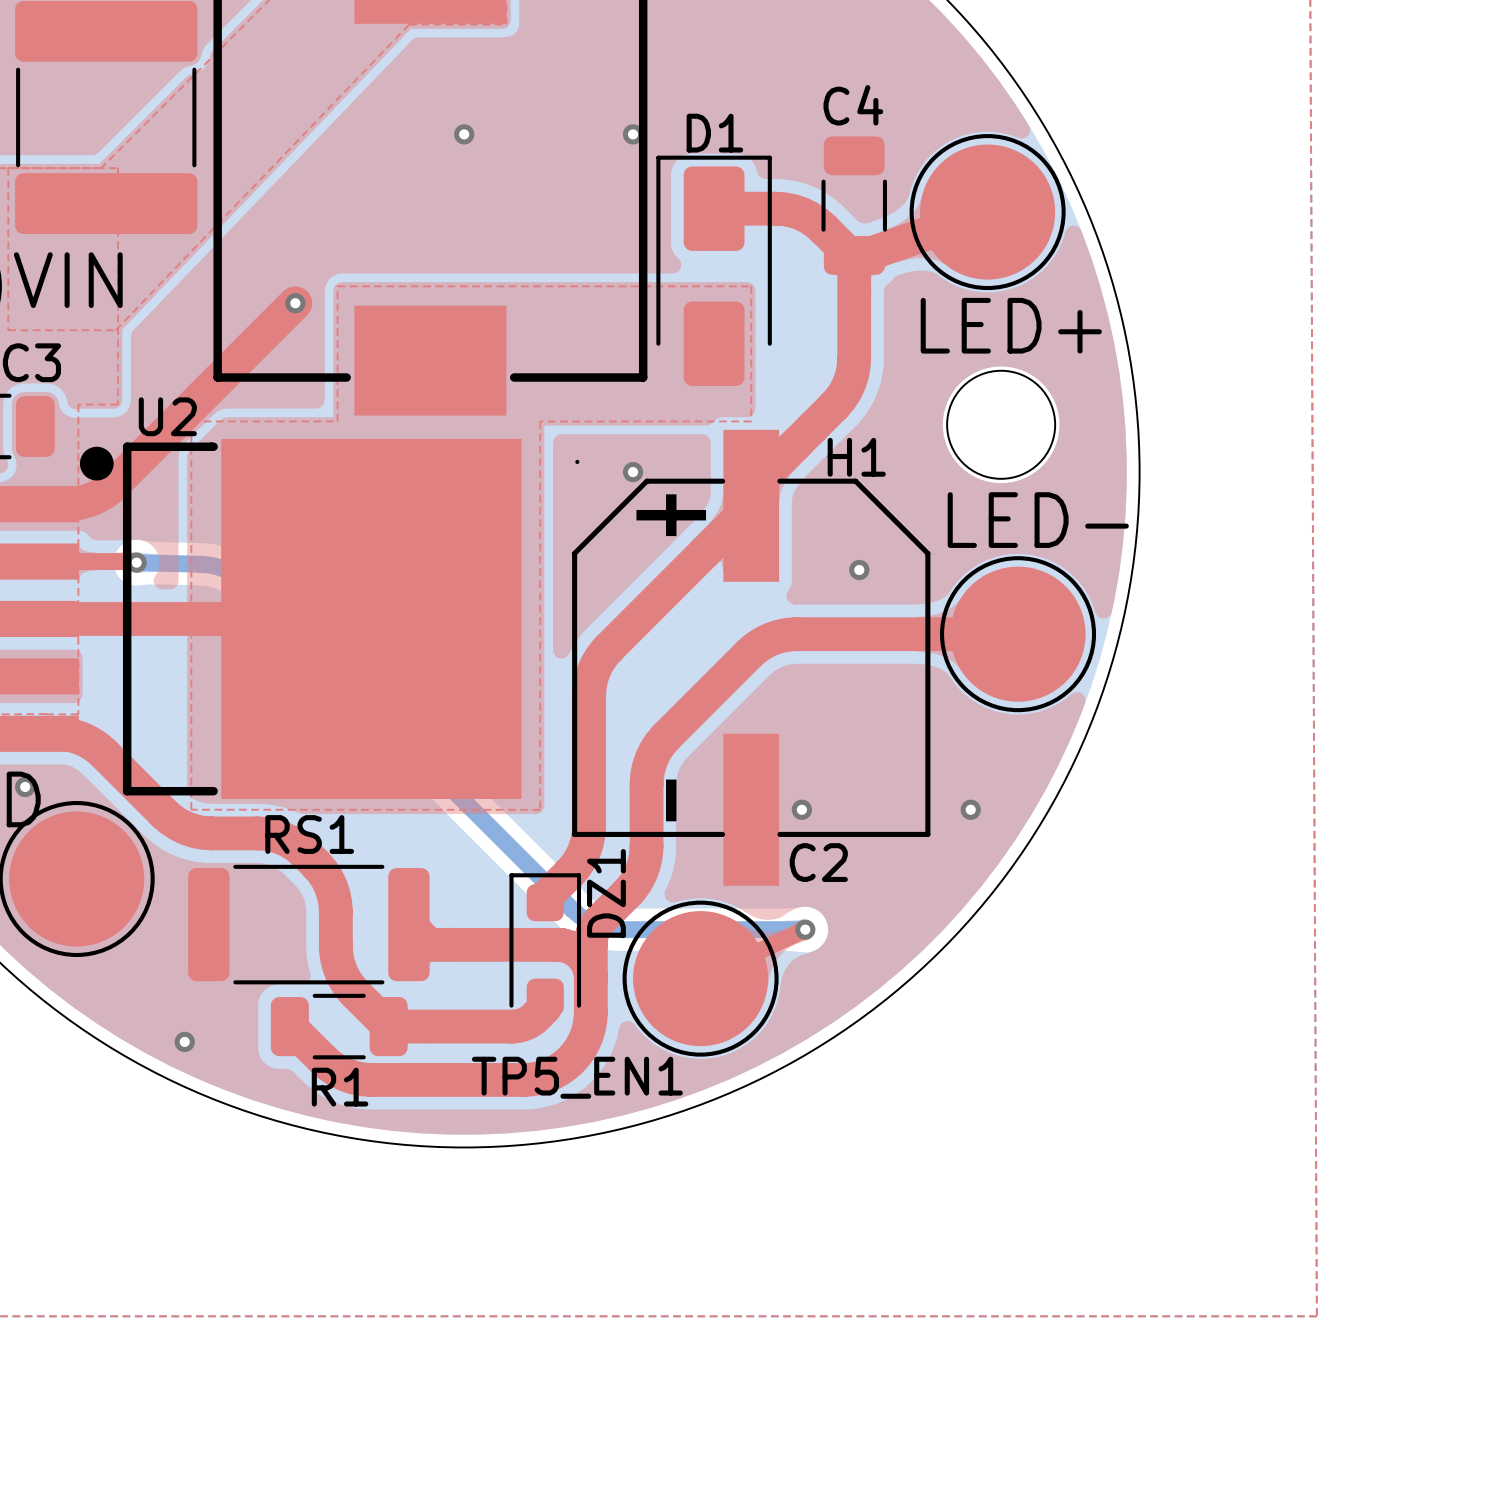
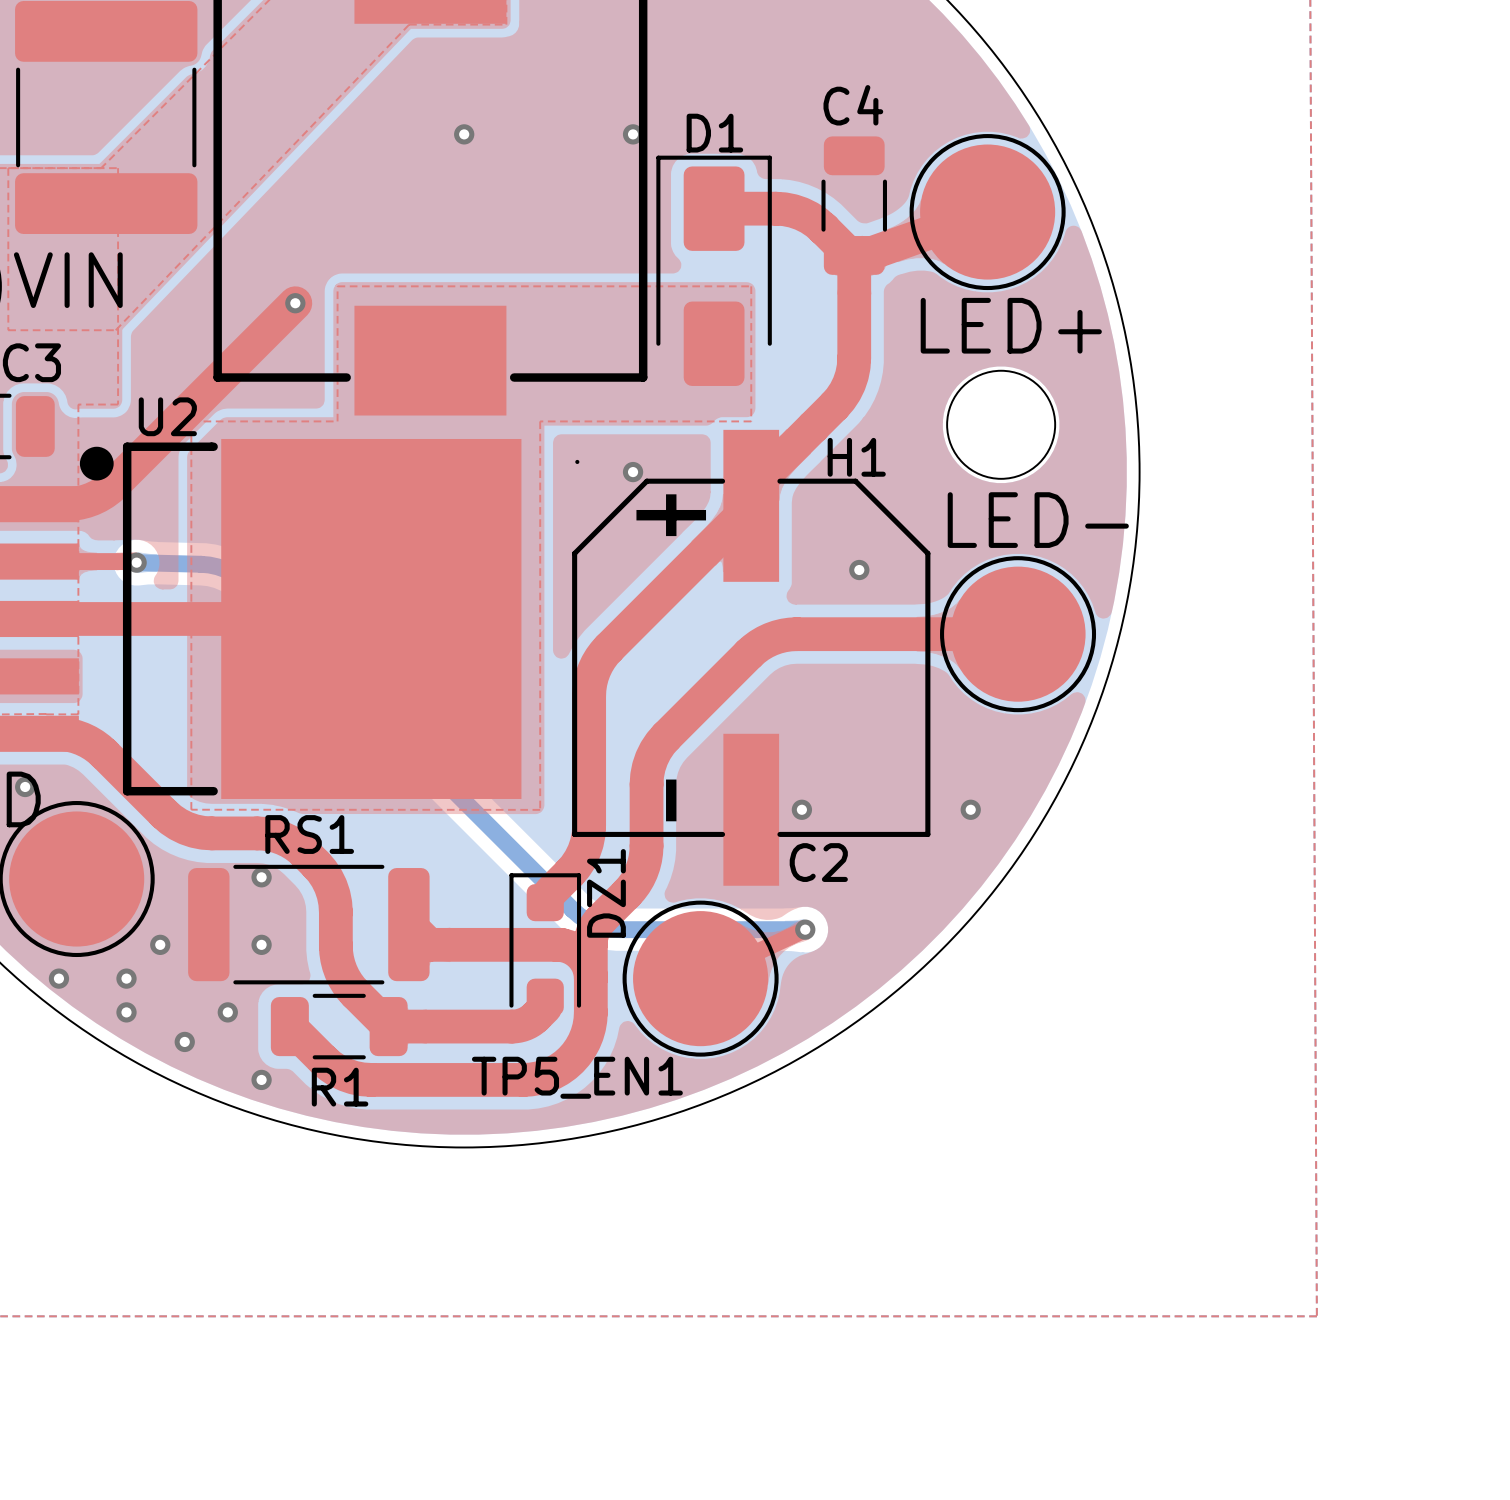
via: none -> (261, 877)
via: none -> (160, 944)
via: none -> (261, 944)
via: none -> (58, 978)
via: none -> (126, 978)
via: none -> (126, 1012)
via: none -> (227, 1012)
via: none -> (261, 1079)

